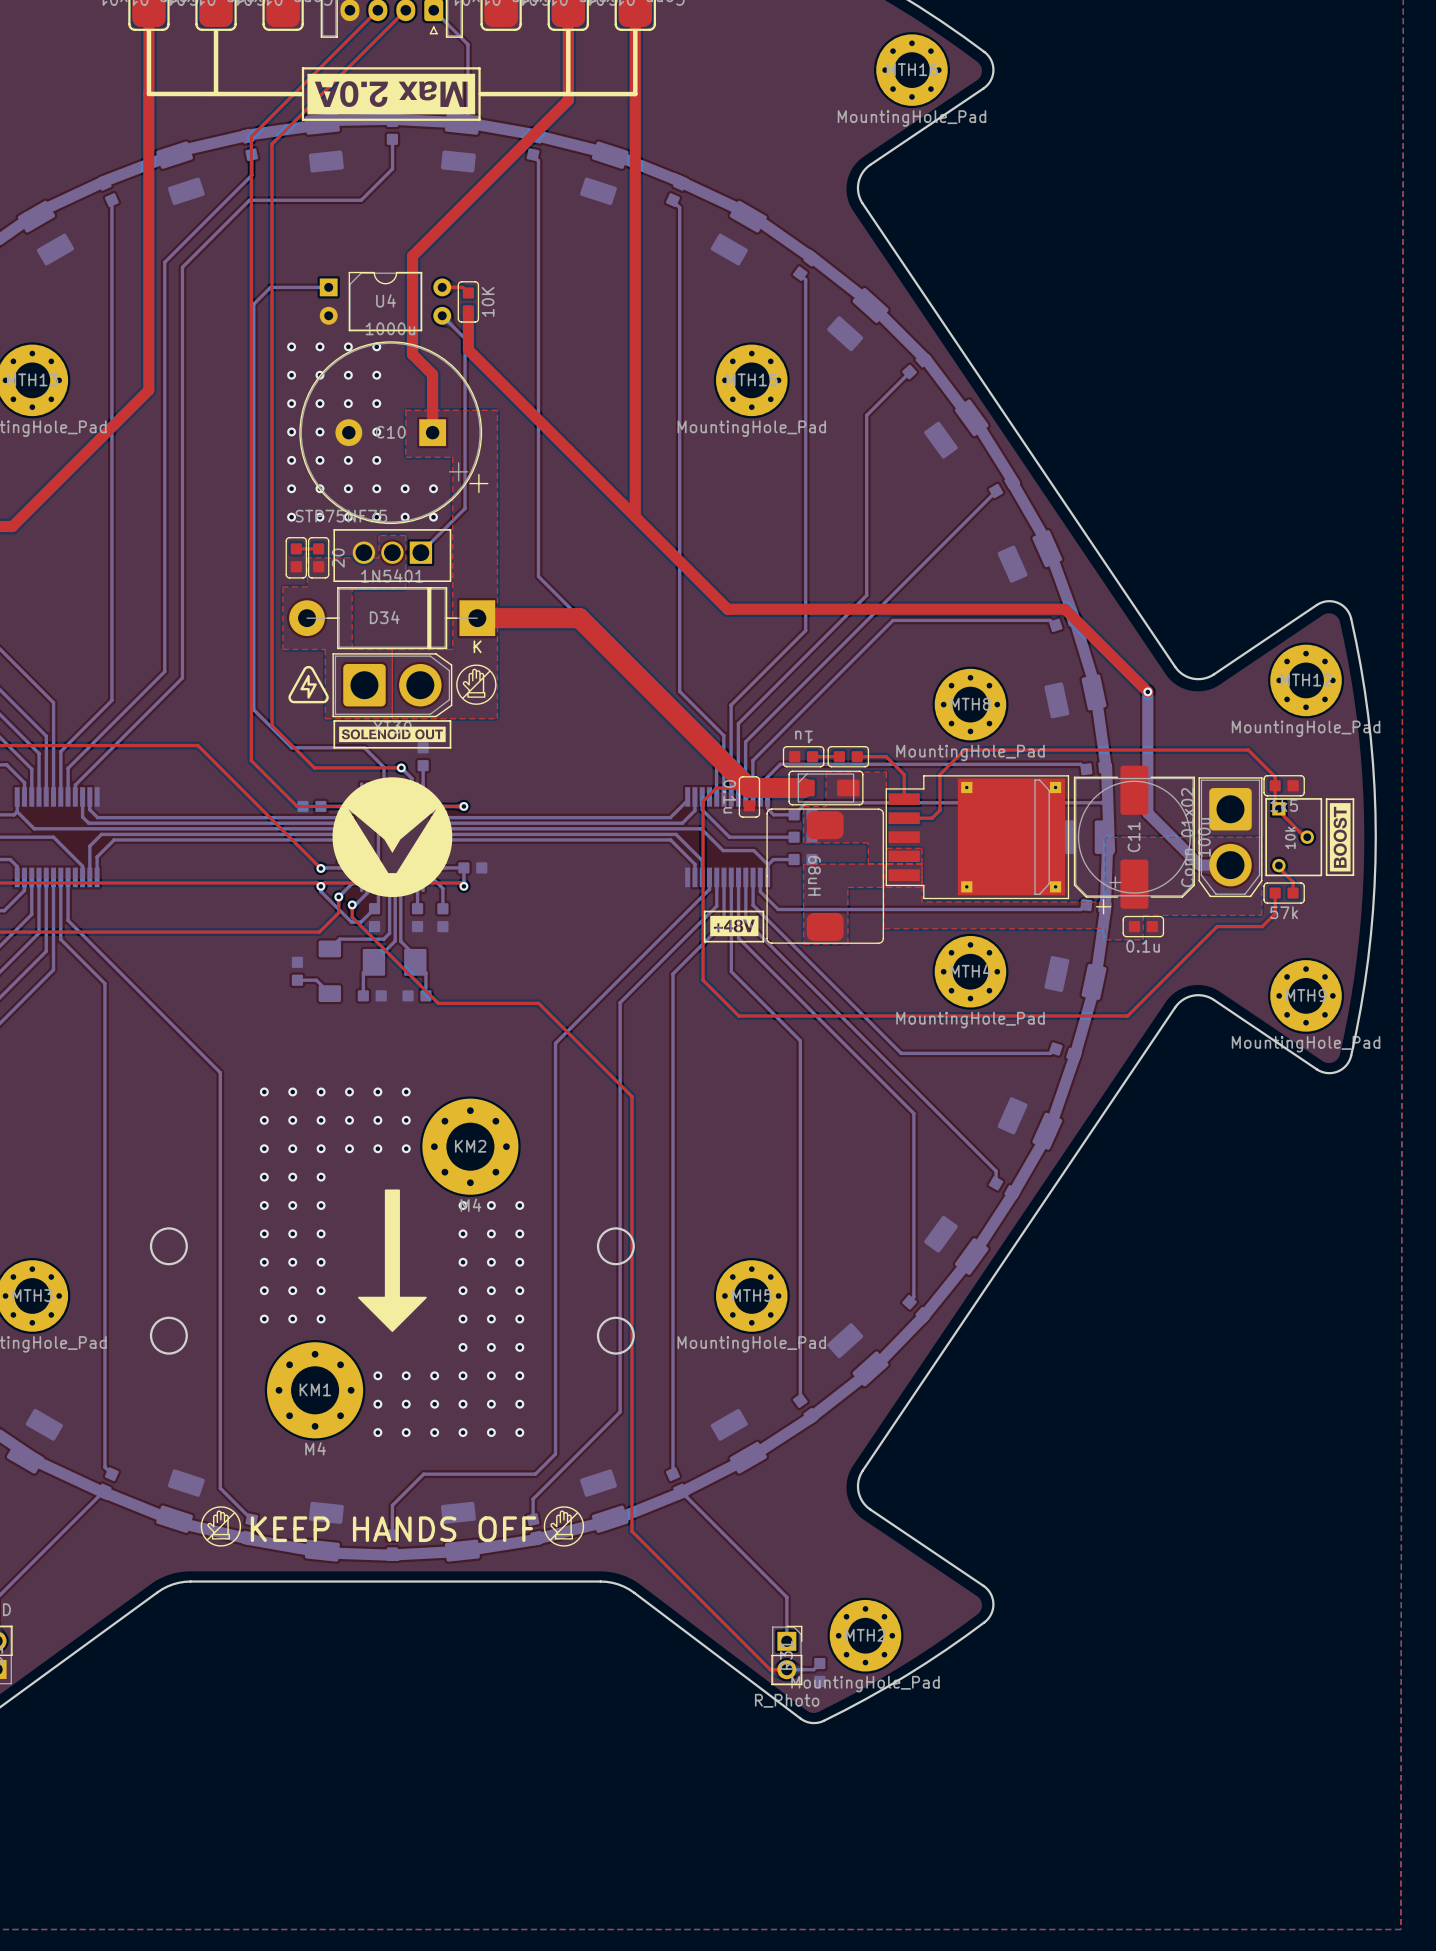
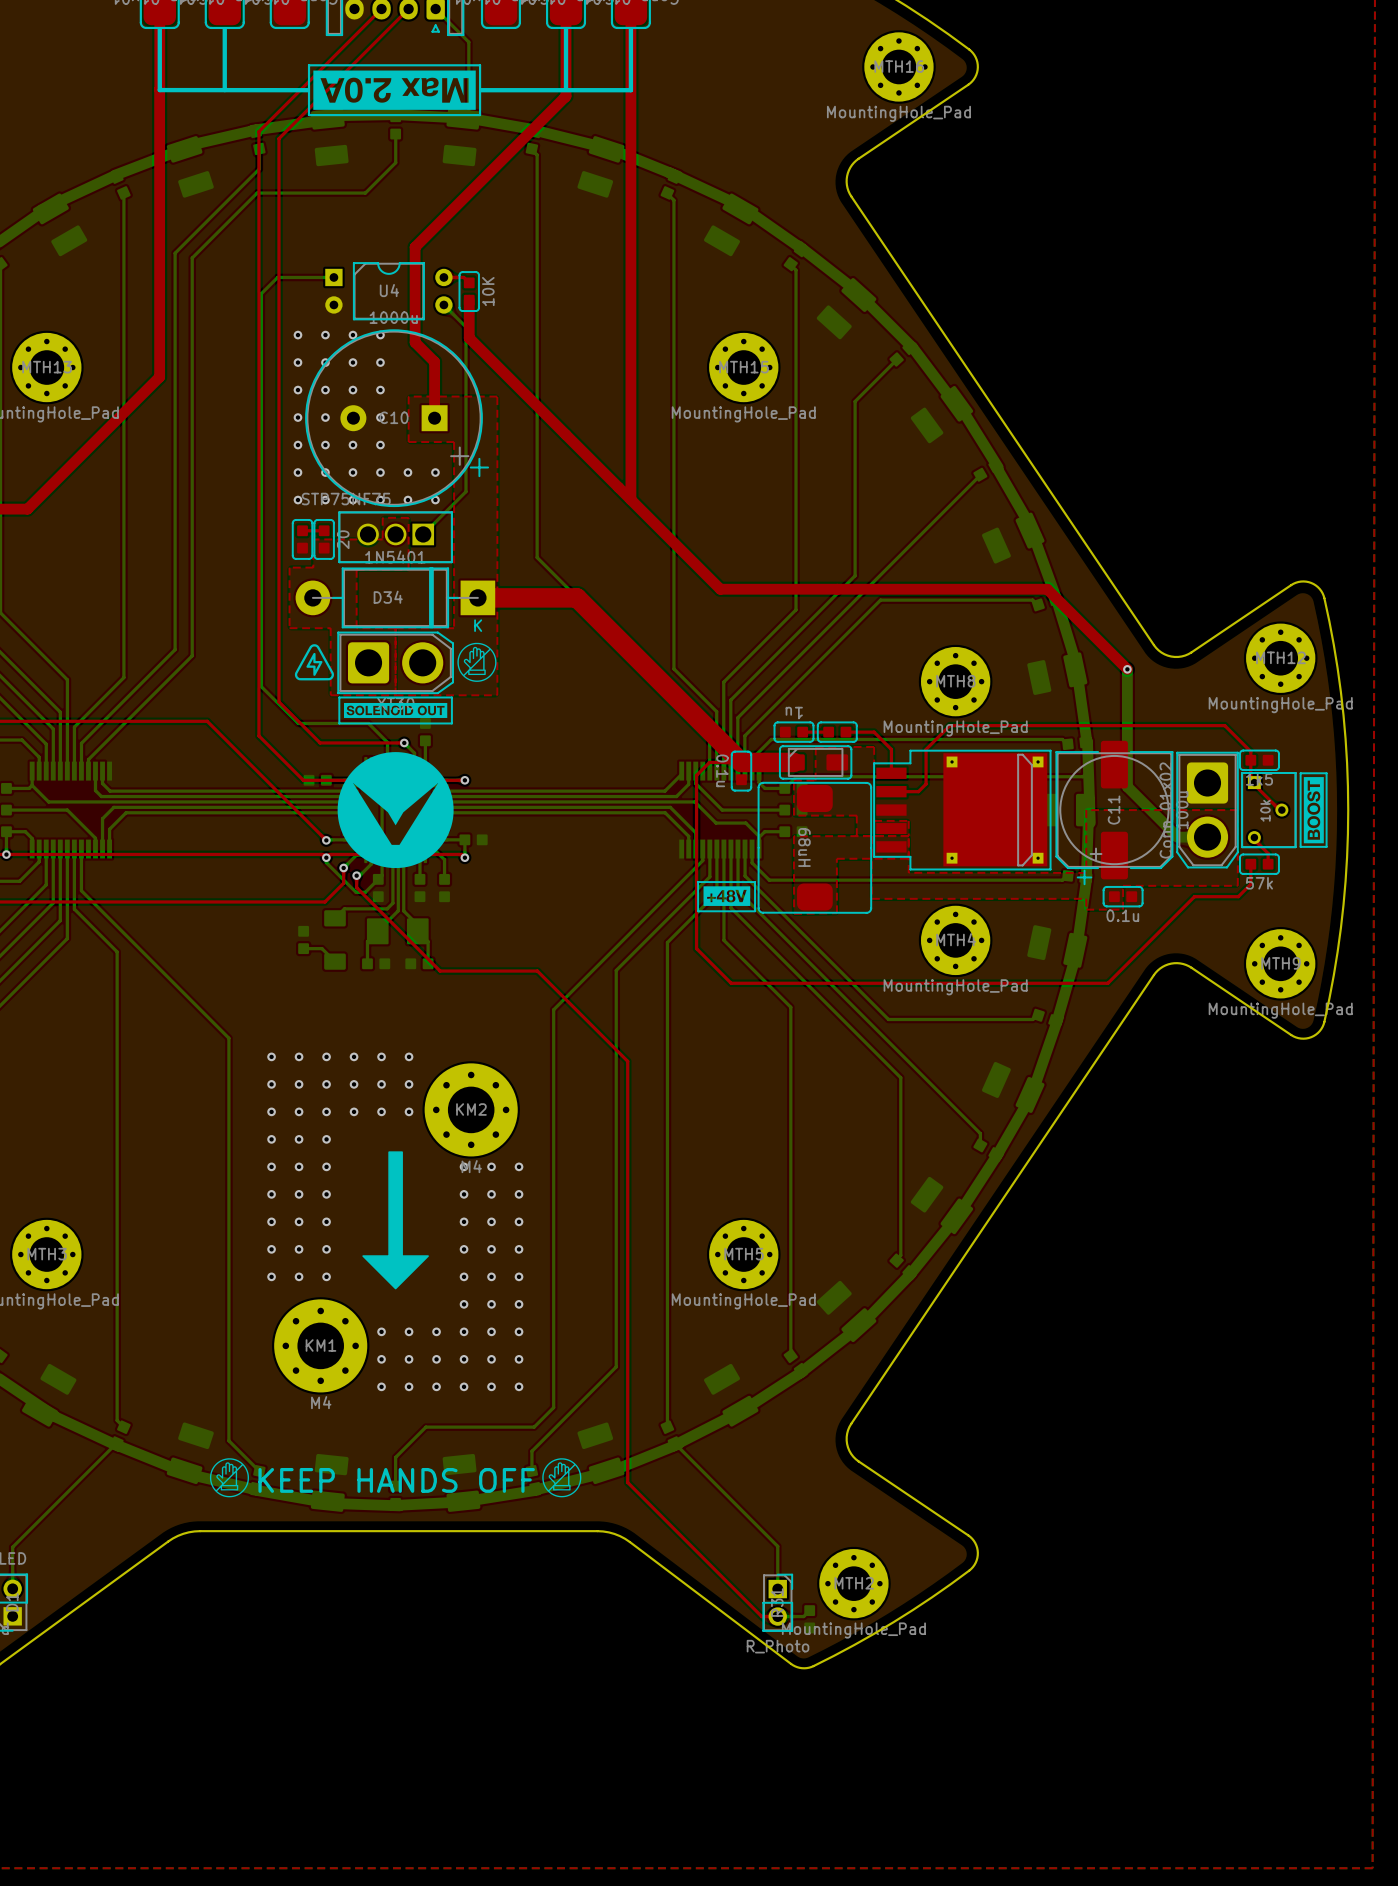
round board edge: [149, 1227, 188, 1266] -> none
round board edge: [596, 1227, 635, 1266] -> none
round board edge: [149, 1316, 188, 1355] -> none
round board edge: [596, 1316, 635, 1355] -> none

